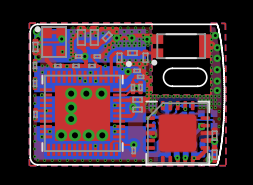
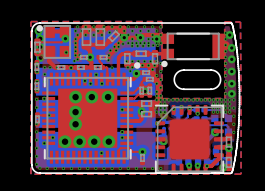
via: none -> (118, 43)
via: (112, 43) -> none
via: none -> (123, 43)
via: (116, 43) -> none
via: (109, 45) -> none
via: (118, 45) -> none
via: (105, 46) -> none
via: none -> (114, 46)
via: none -> (118, 46)
via: (113, 47) -> none
via: none -> (110, 50)
via: none -> (108, 55)
via: (106, 54) -> none
via: none -> (108, 60)
via: (105, 59) -> none
via: (122, 64) -> none
via: (118, 65) -> none
via: none -> (127, 67)

